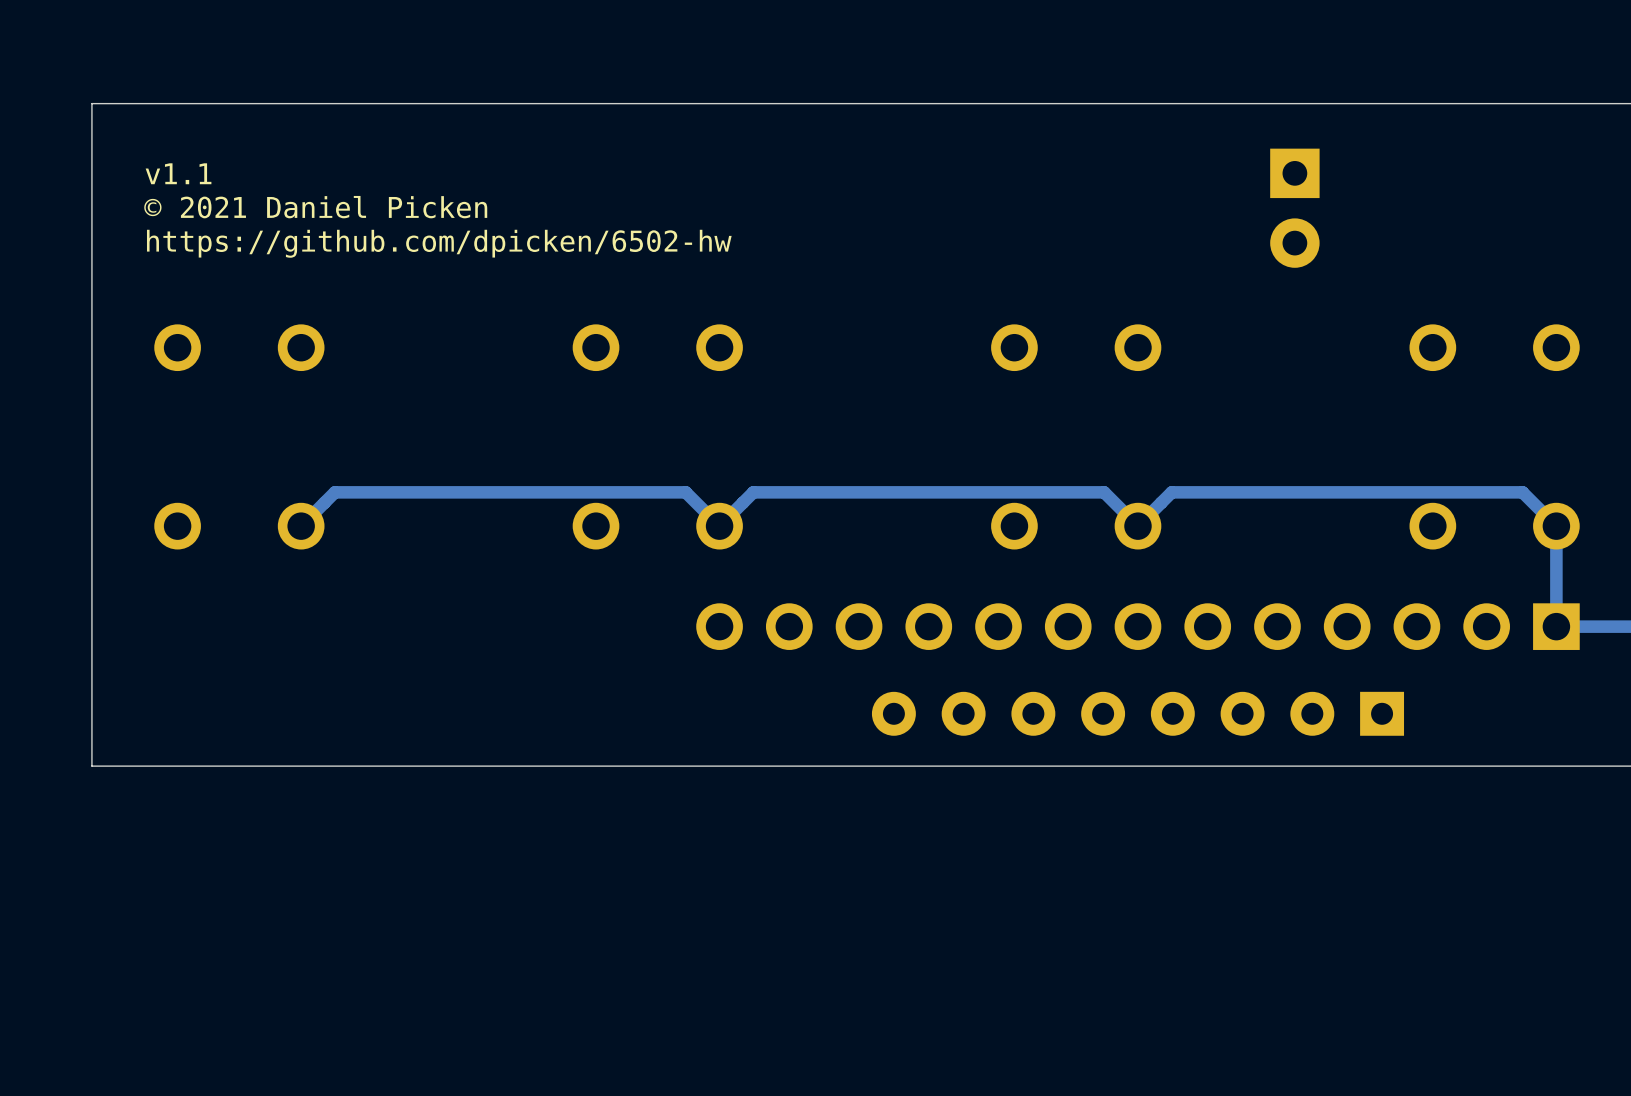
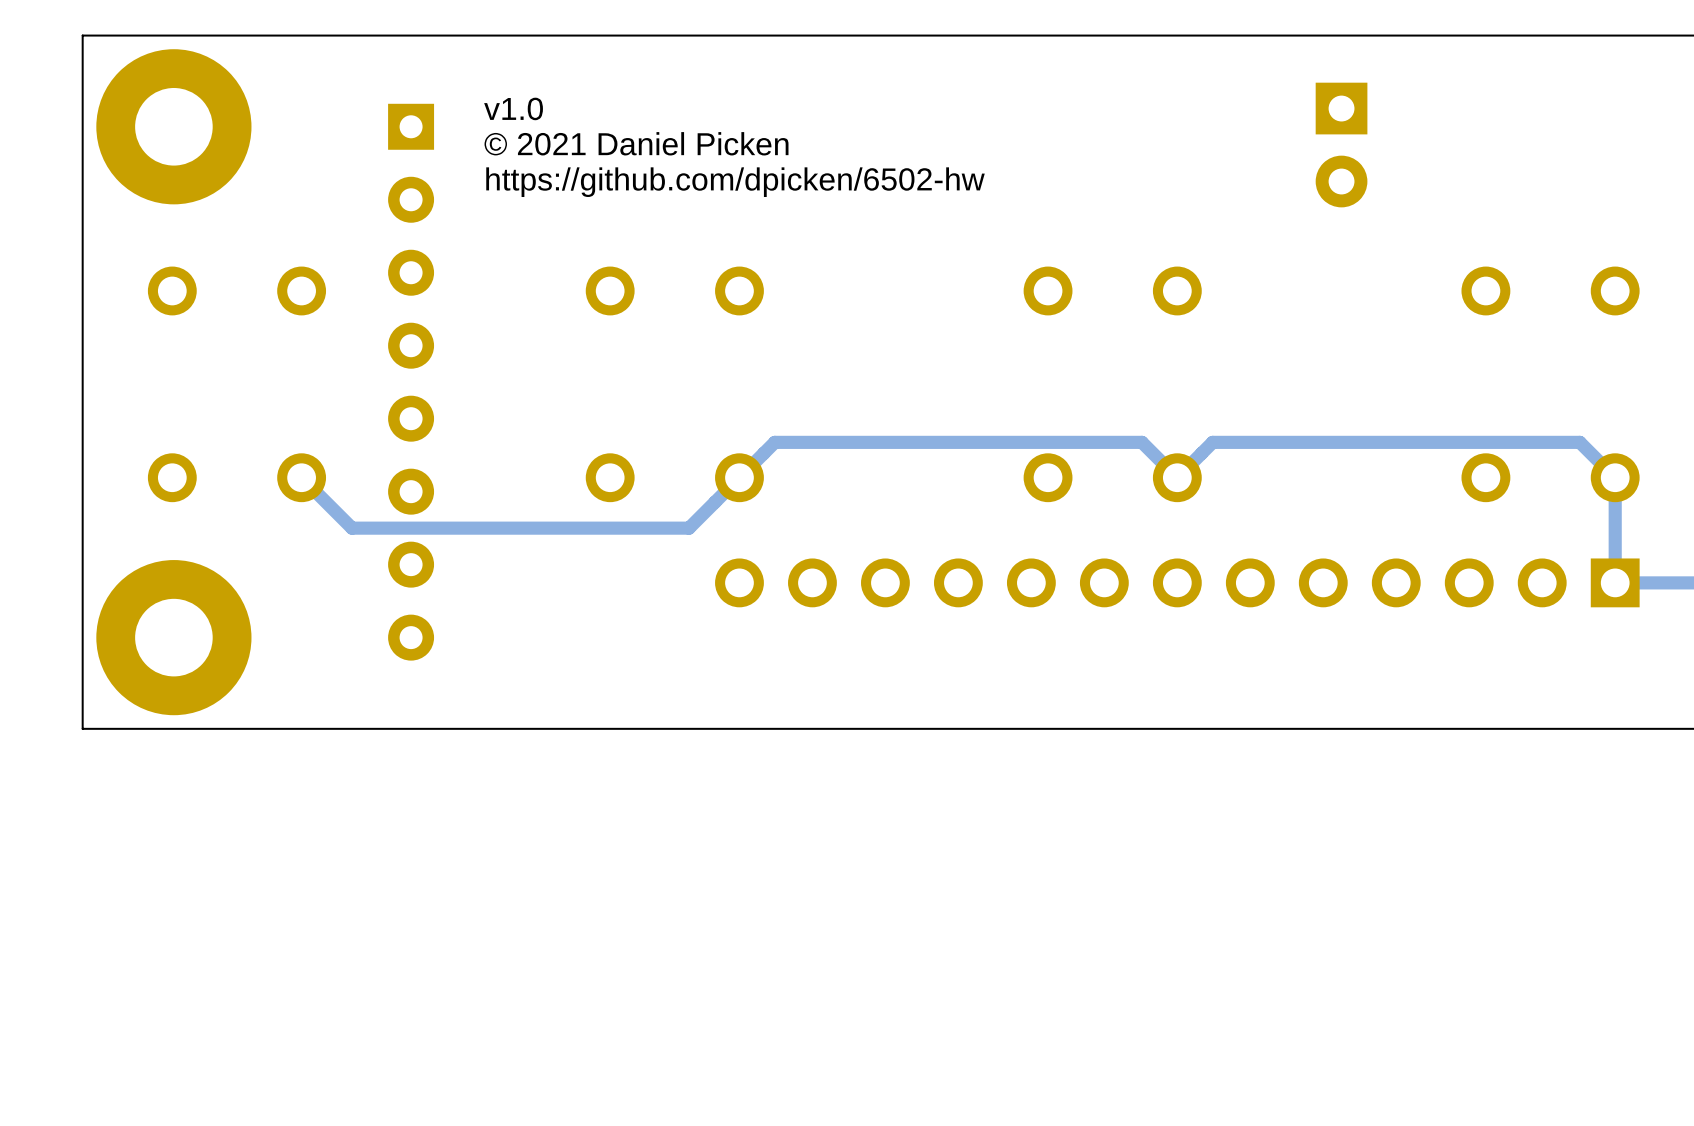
text: v1.1 (178, 173) -> none
text: none -> v1.0 (513, 108)
part: none -> (173, 126)
text position: © 2021 Daniel Picken (315, 207) -> © 2021 Daniel Picken (636, 143)
text position: https://github.com/dpicken/6502-hw (439, 243) -> https://github.com/dpicken/6502-hw (735, 182)
part: none -> (411, 382)
track: (719, 526) (685, 492) (334, 492) (301, 526) -> (739, 477) (689, 528) (352, 528) (301, 477)
part: none -> (173, 637)
part: (1137, 713) -> none

